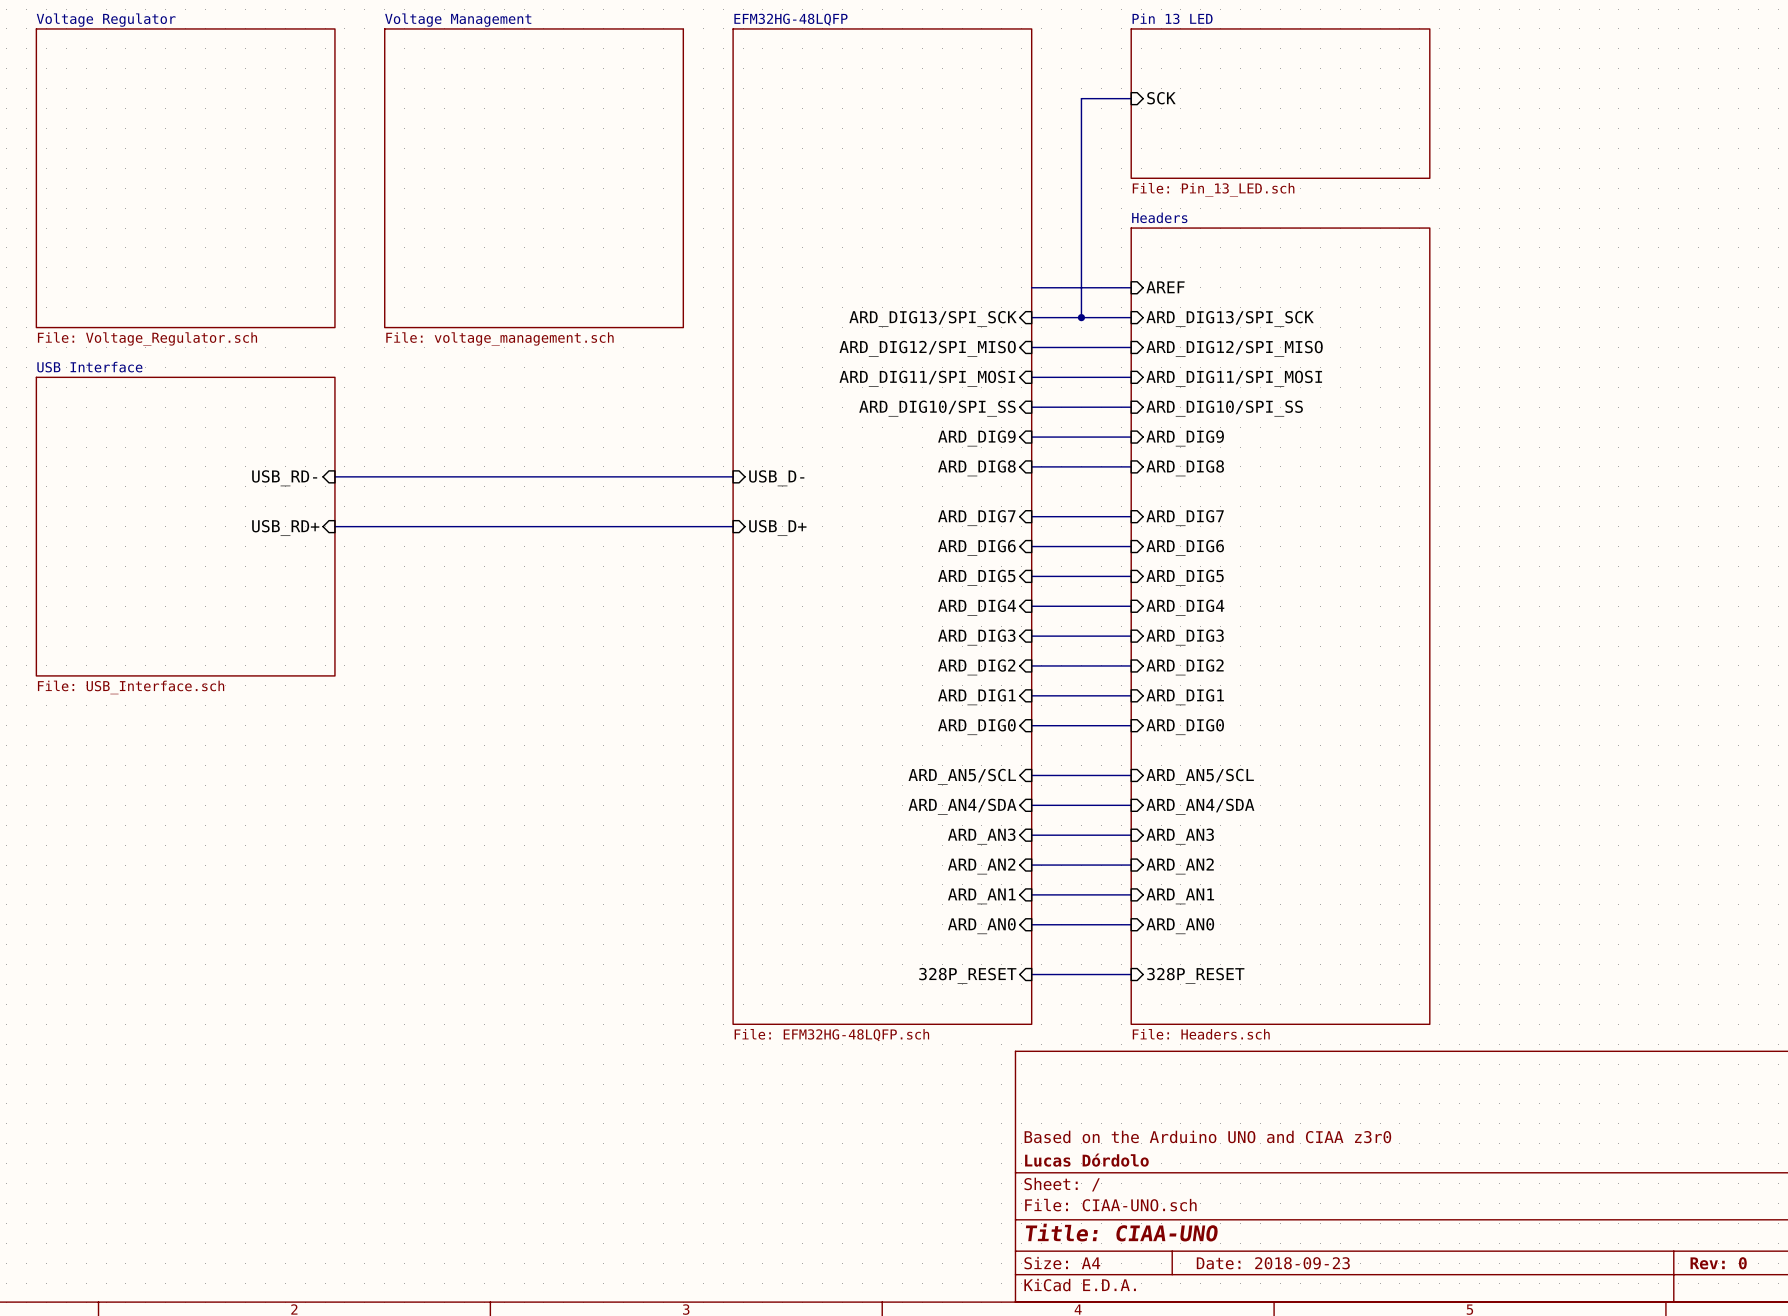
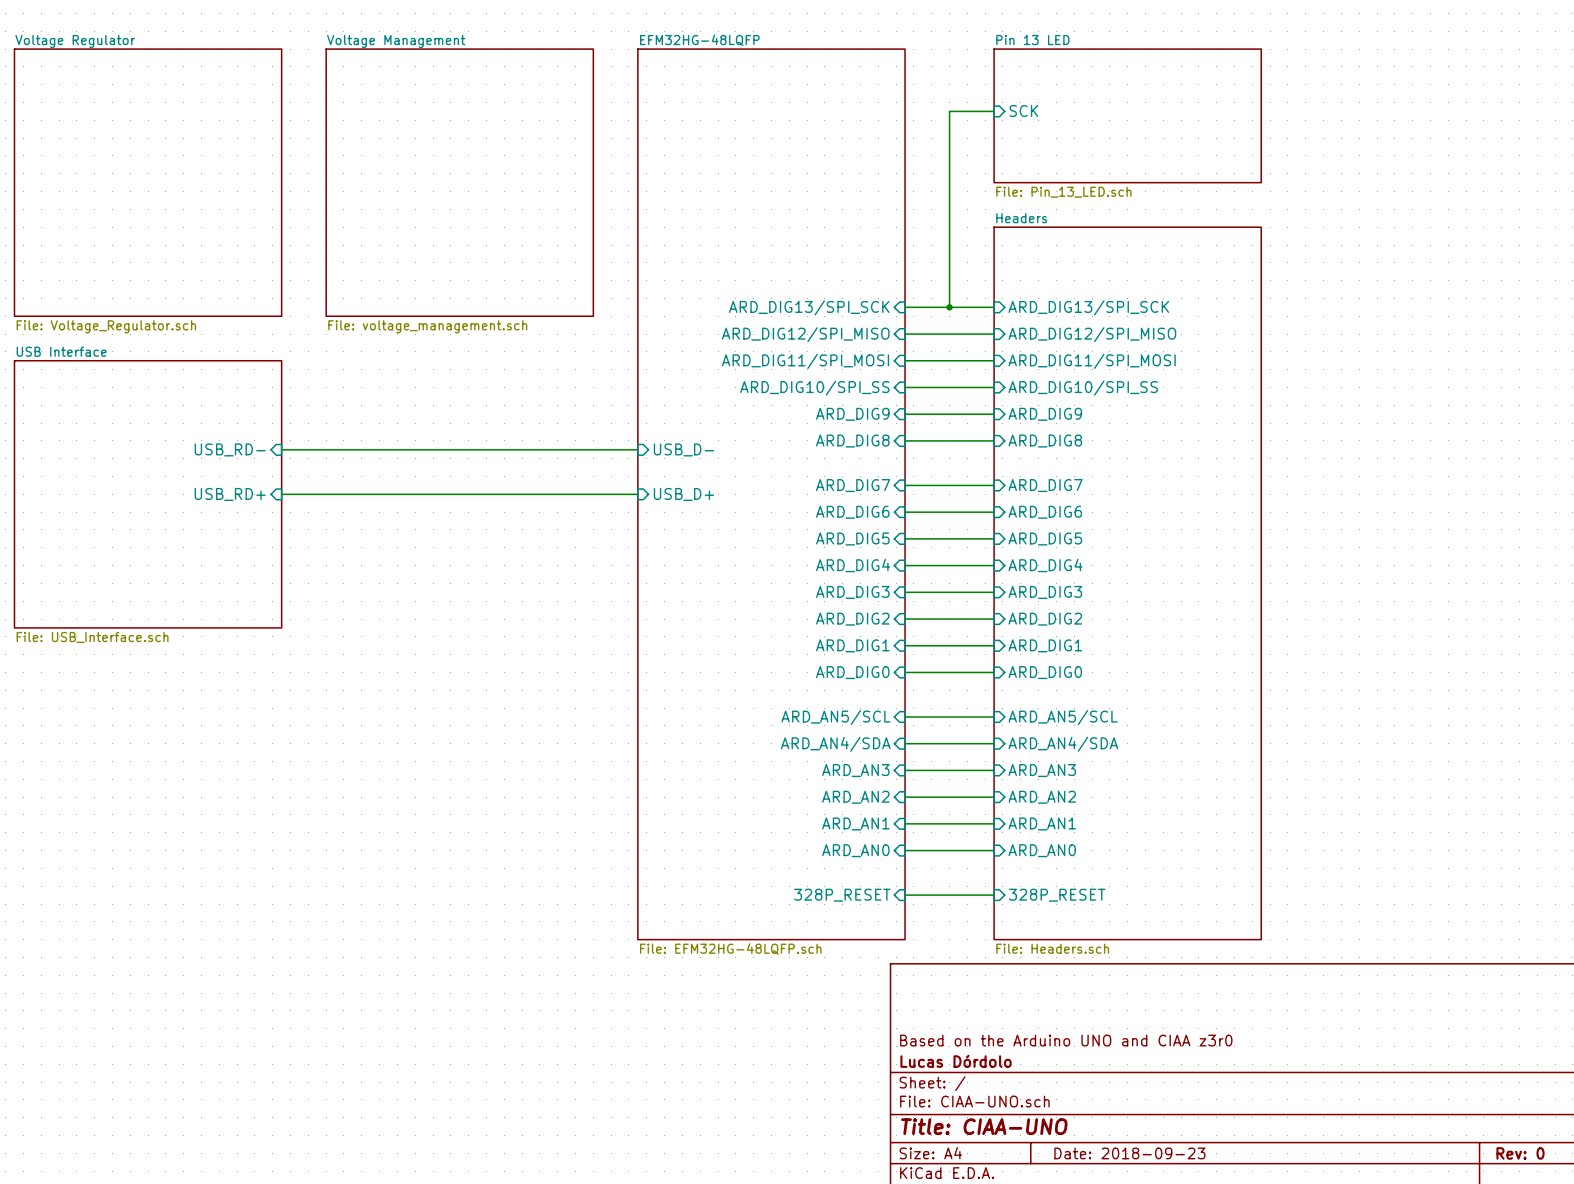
wire: (1031, 287) (1131, 287) -> none
sheet pin: AREF (1165, 287) -> none

